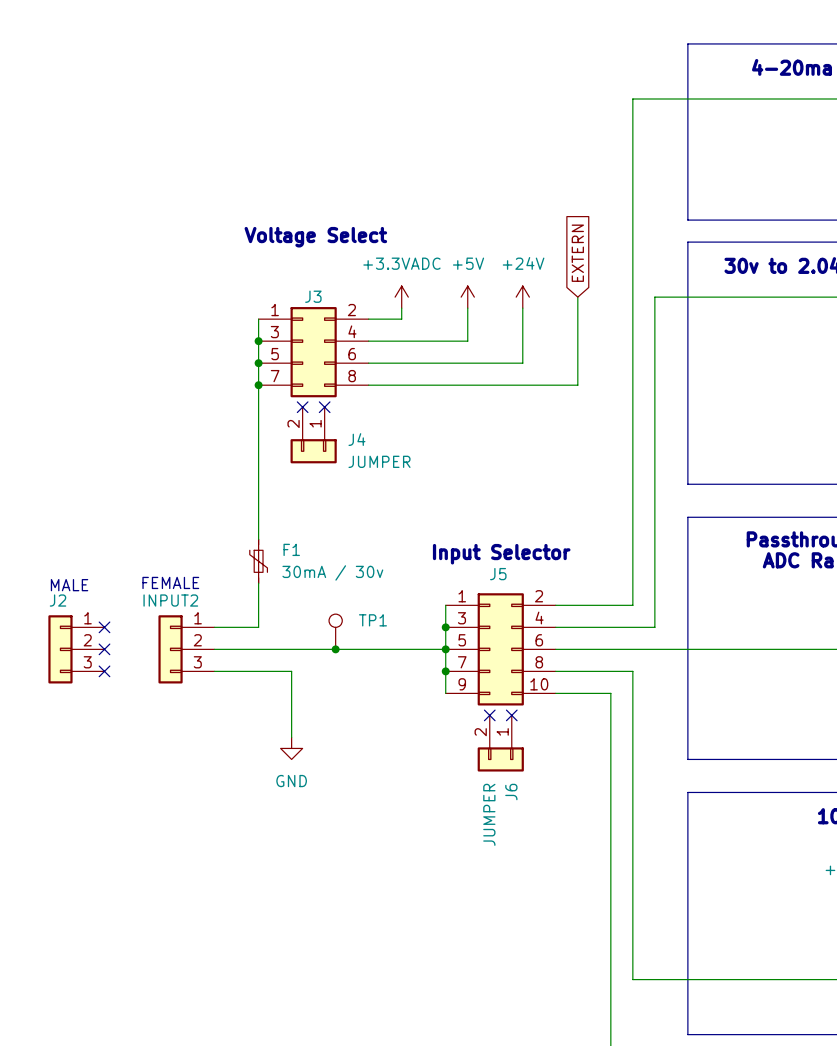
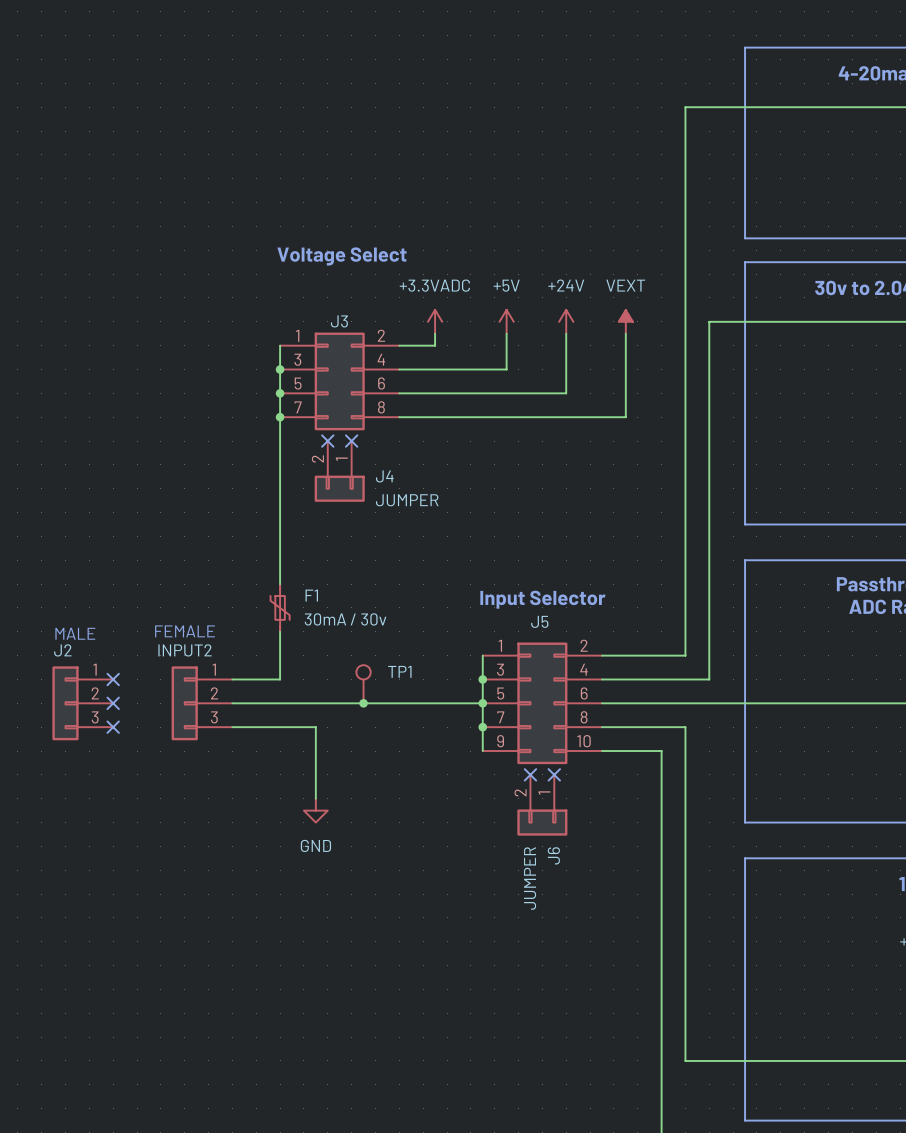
global label: EXTERN (577, 253) -> none
power symbol: none -> VEXT (625, 321)

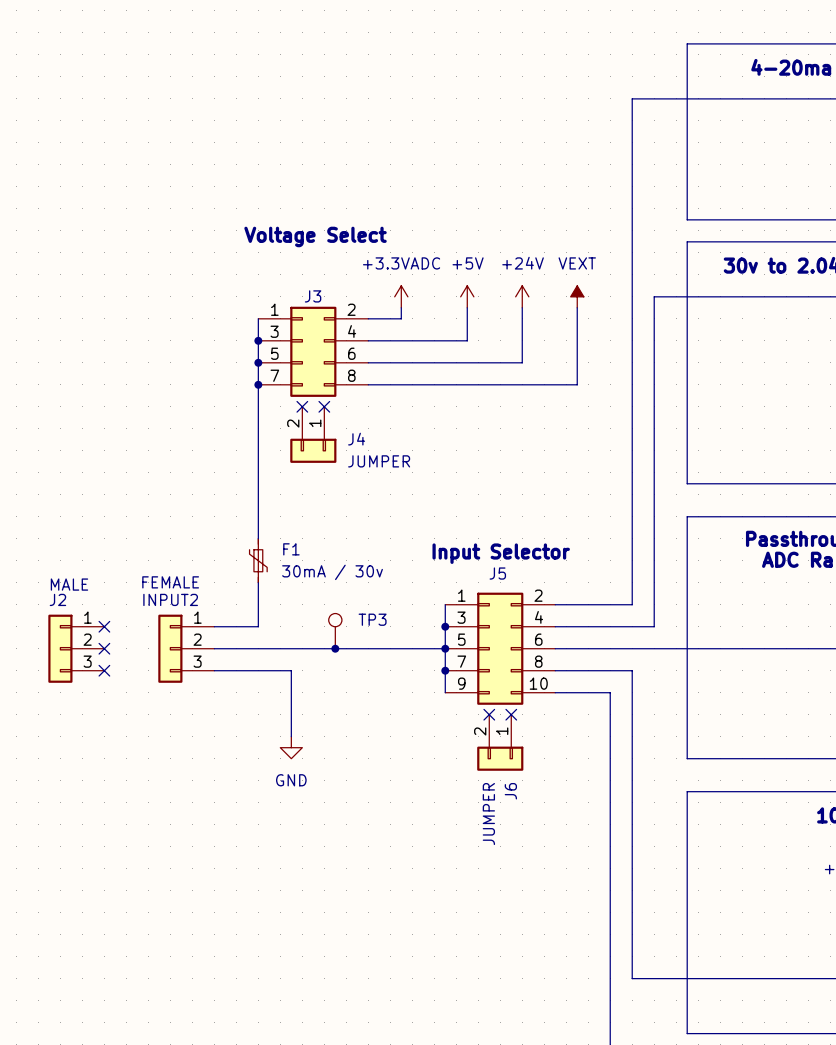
TP1 name: TP1 (399, 671) -> TP3 (372, 619)

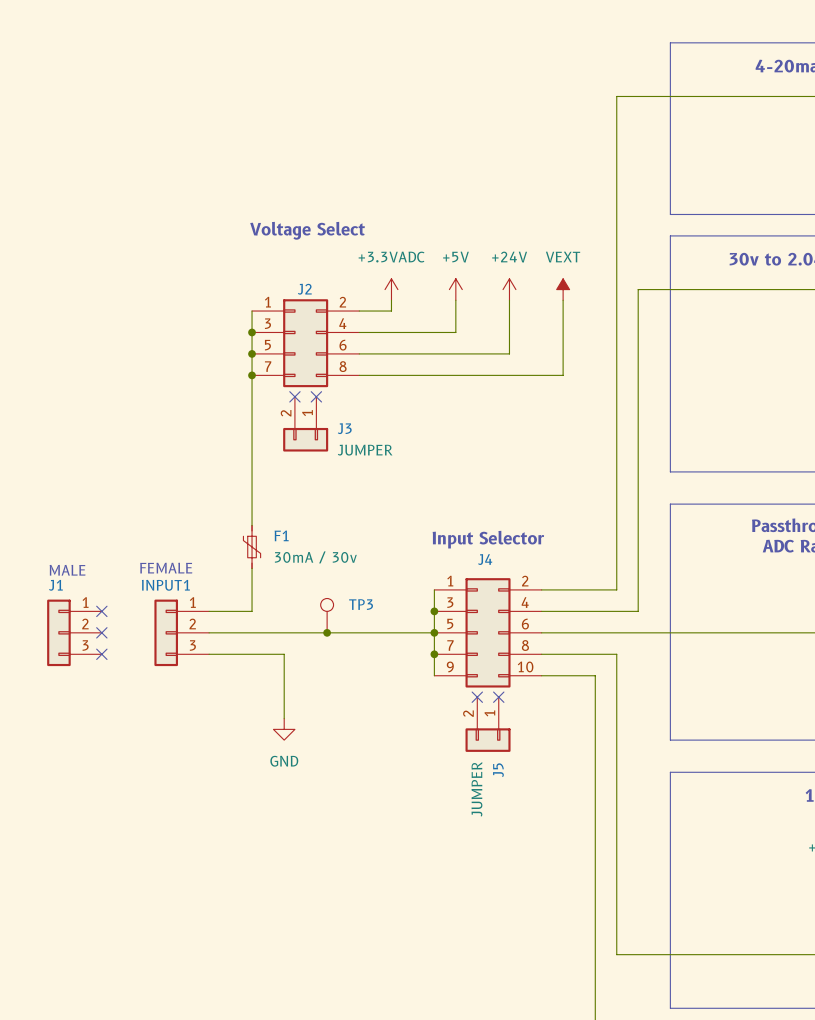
J3 name: J3 (313, 296) -> J2 (304, 289)
J4 name: J4 (356, 439) -> J3 (344, 428)
J5 name: J5 (497, 573) -> J4 (485, 559)
J2 name: J2 (57, 599) -> J1 (55, 585)
INPUT2 name: INPUT2 (170, 599) -> INPUT1 (165, 585)
J6 name: J6 (510, 791) -> J5 (498, 770)

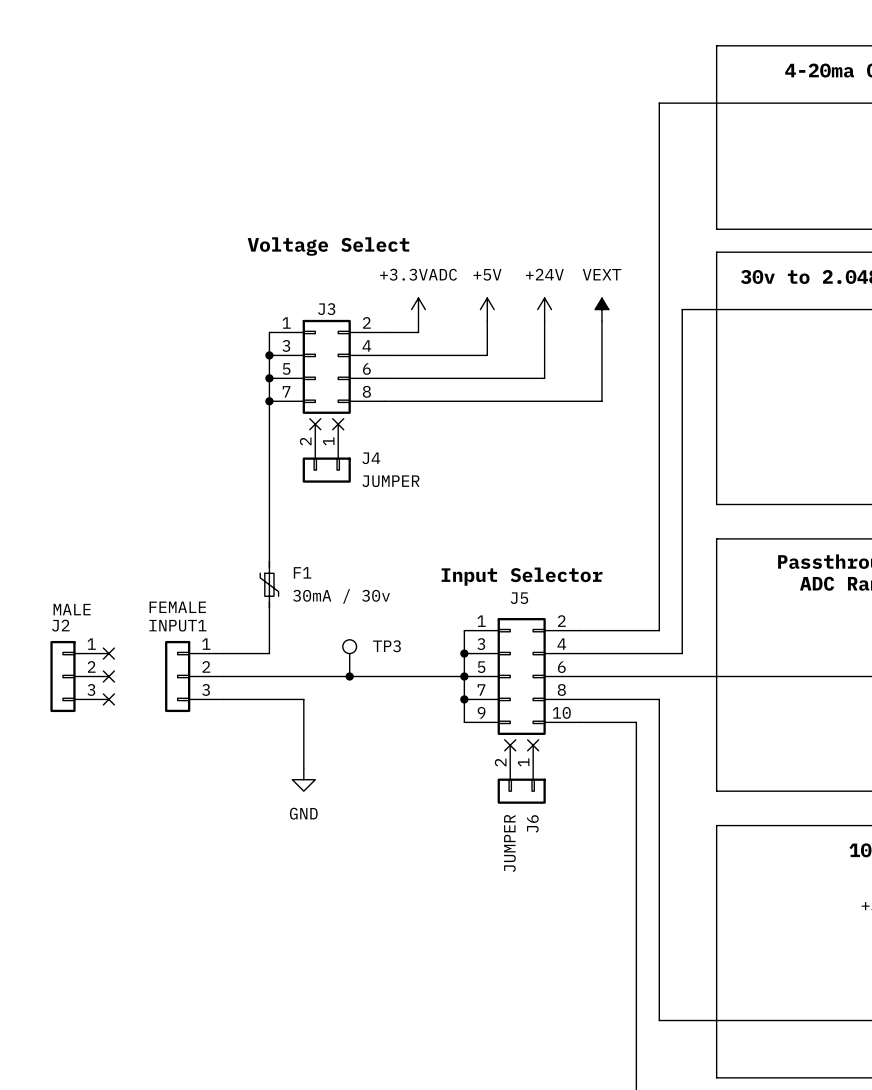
J2 name: J2 (304, 289) -> J3 (326, 309)
J3 name: J3 (344, 428) -> J4 (371, 458)
J4 name: J4 (485, 559) -> J5 (519, 598)
J1 name: J1 (55, 585) -> J2 (60, 625)
J5 name: J5 (498, 770) -> J6 (532, 823)

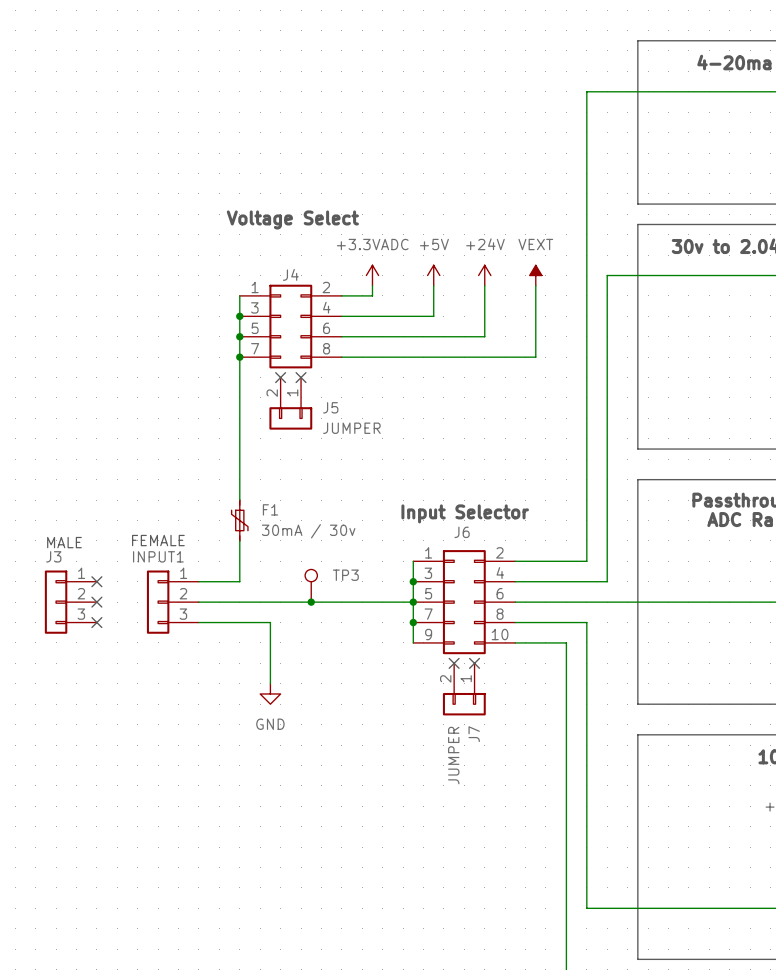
J3 name: J3 (326, 309) -> J4 (290, 274)
J4 name: J4 (371, 458) -> J5 (330, 407)
J5 name: J5 (519, 598) -> J6 (462, 532)
J2 name: J2 (60, 625) -> J3 (53, 556)
J6 name: J6 (532, 823) -> J7 (474, 734)

